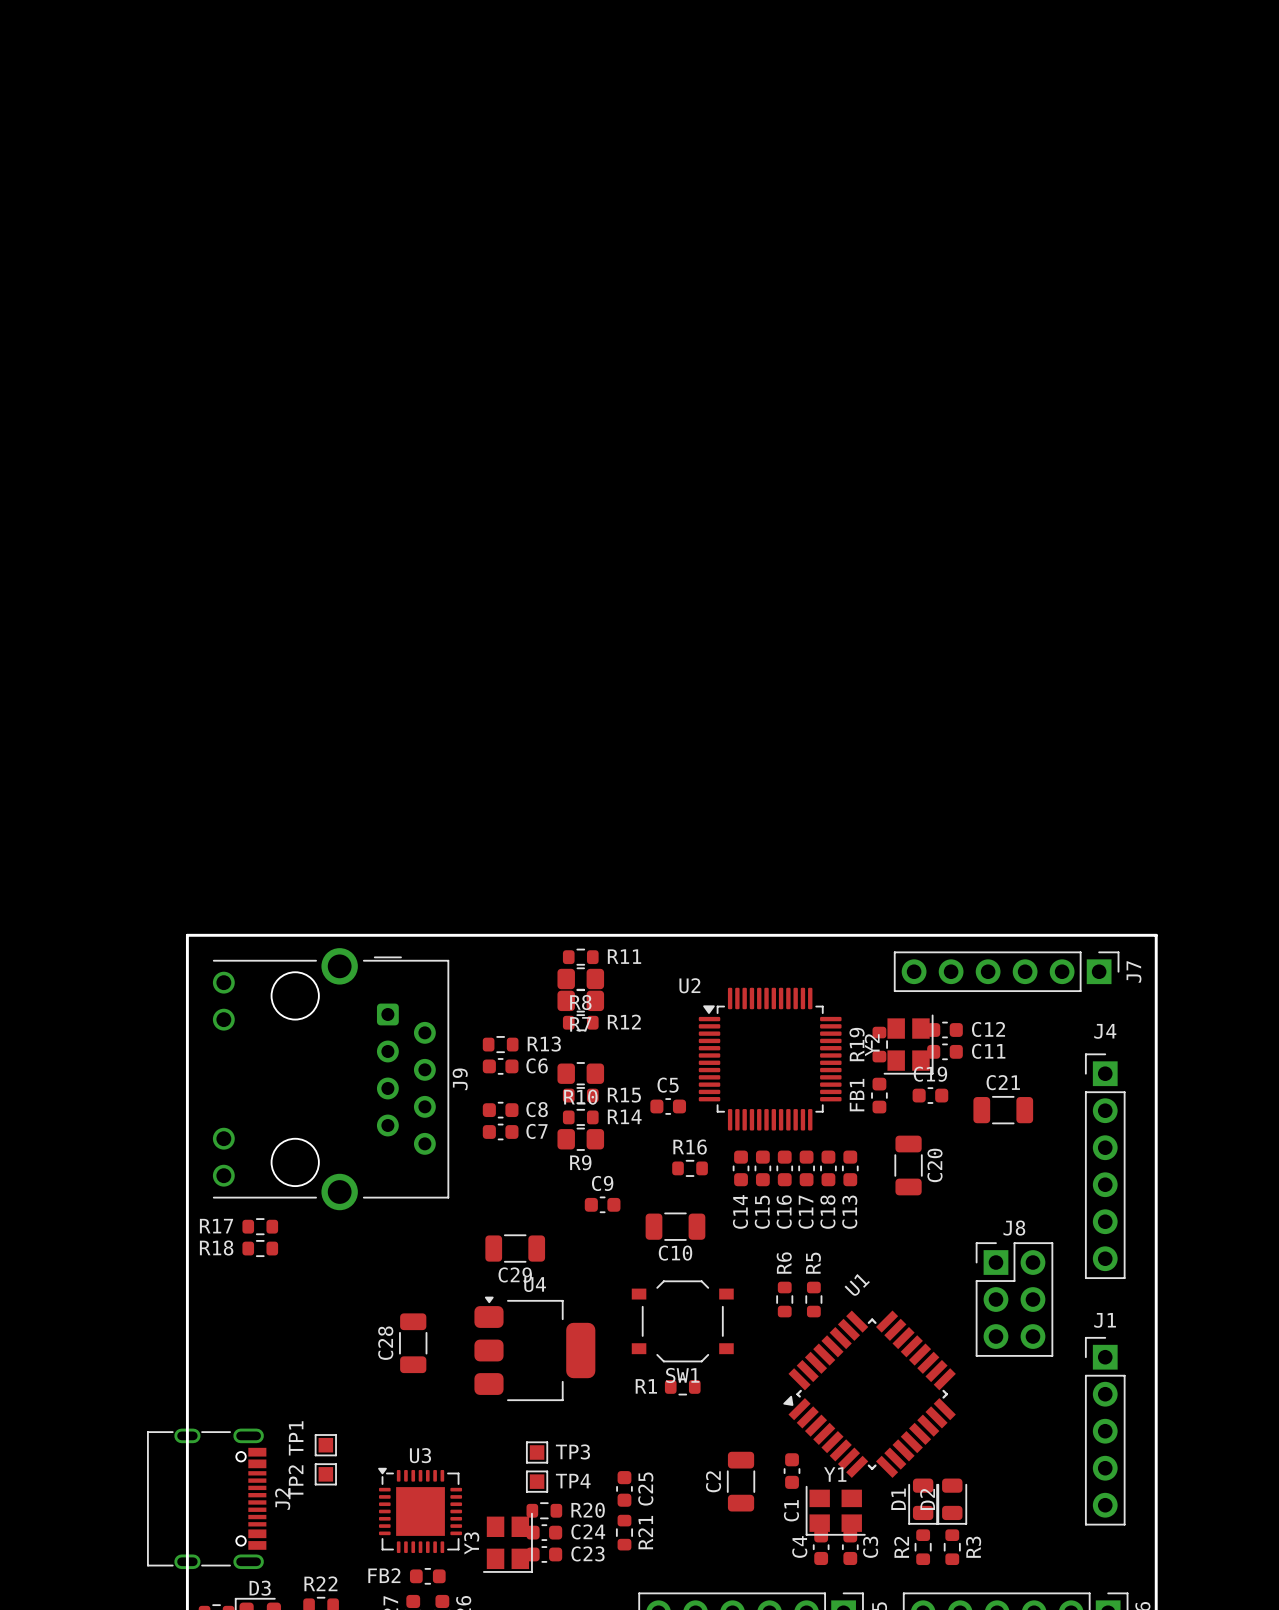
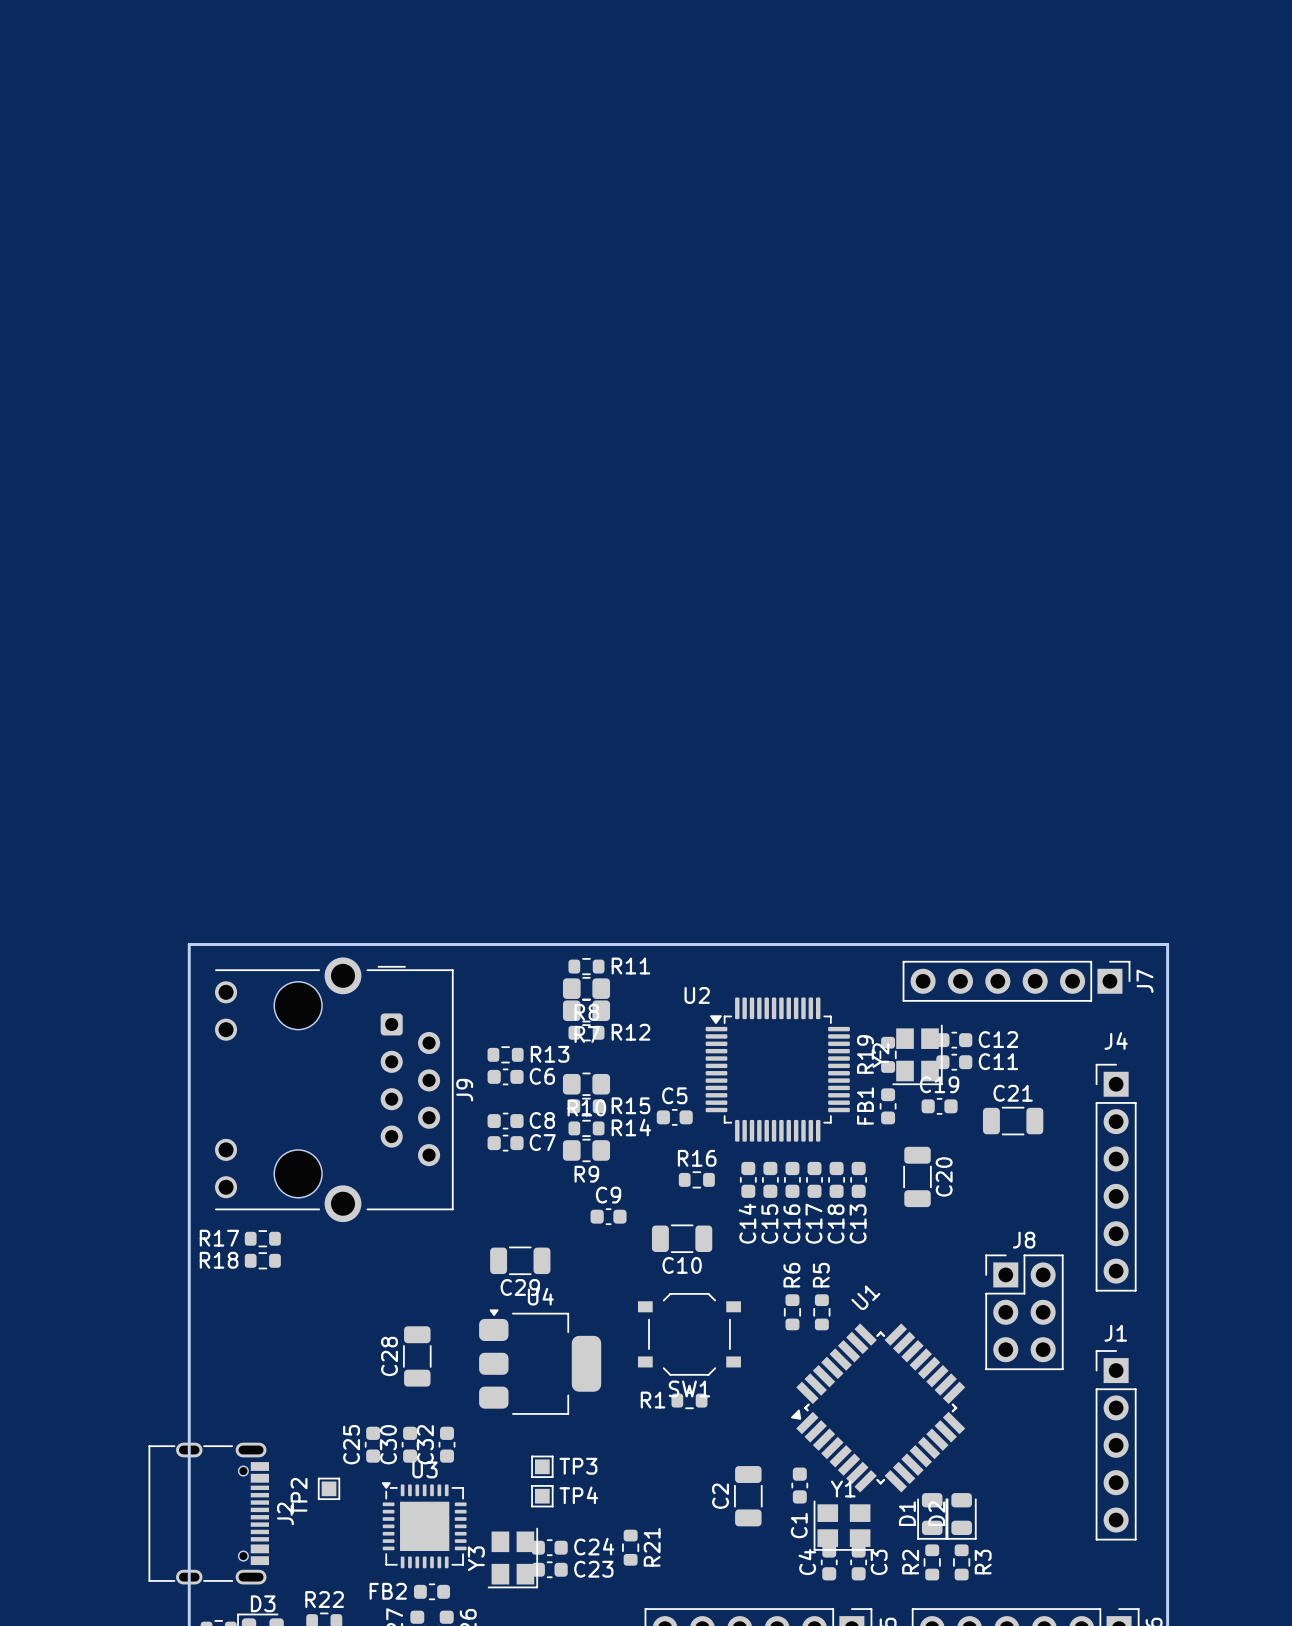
C30: none -> (410, 1444)
C32: none -> (447, 1444)
TP1: (325, 1445) -> none
C25 position: (624, 1488) -> (373, 1444)
C25 name position: C25 (645, 1489) -> C25 (351, 1444)
R20: (544, 1510) -> none

